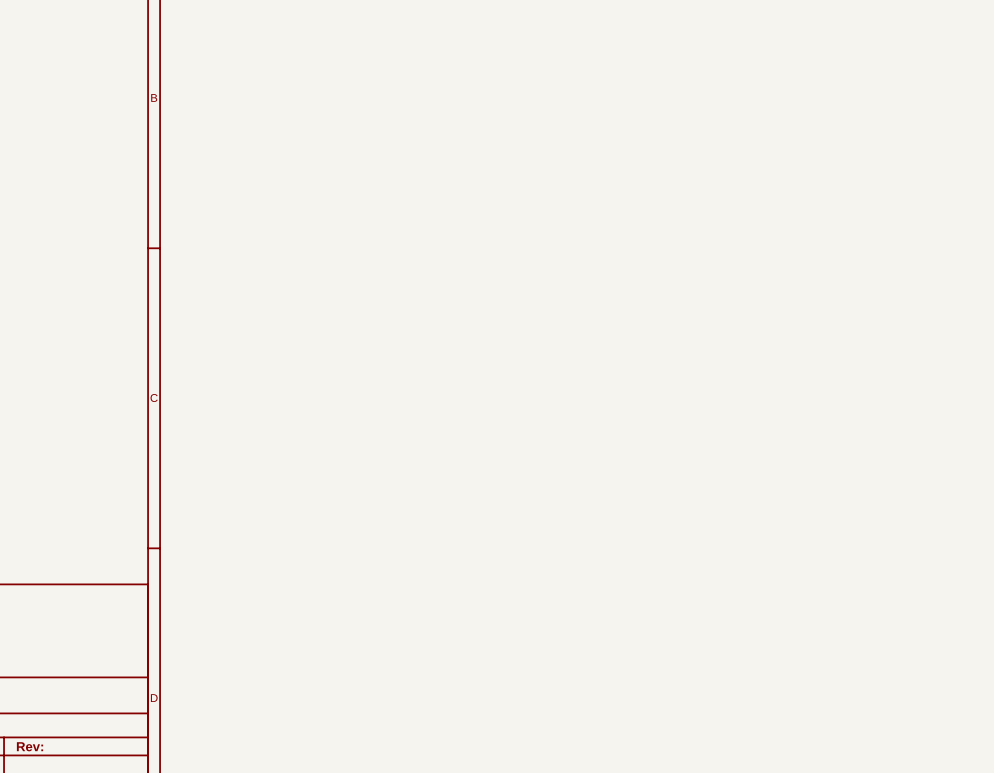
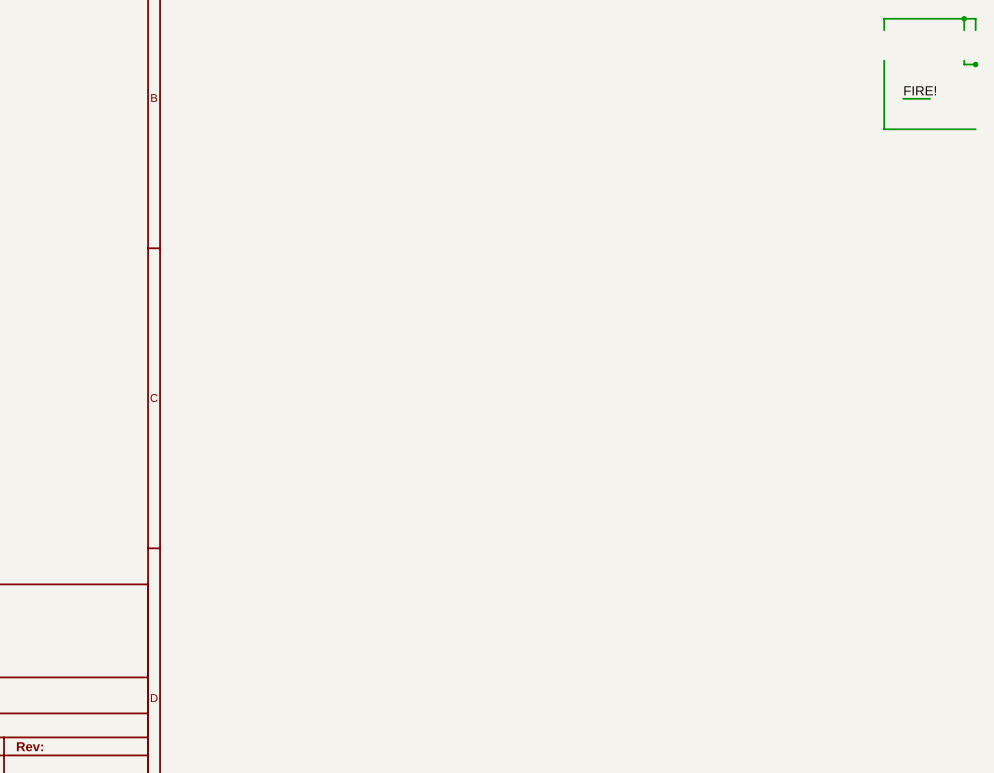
wire: none -> (964, 18) (964, 30)
junction: none -> (964, 18)
wire: none -> (884, 30) (884, 18) (975, 18) (975, 30)
wire: none -> (884, 60) (884, 129) (975, 129)
wire: none -> (964, 60) (964, 64) (975, 64)
junction: none -> (975, 64)
label: none -> FIRE! (920, 90)
wire: none -> (903, 98) (929, 98)

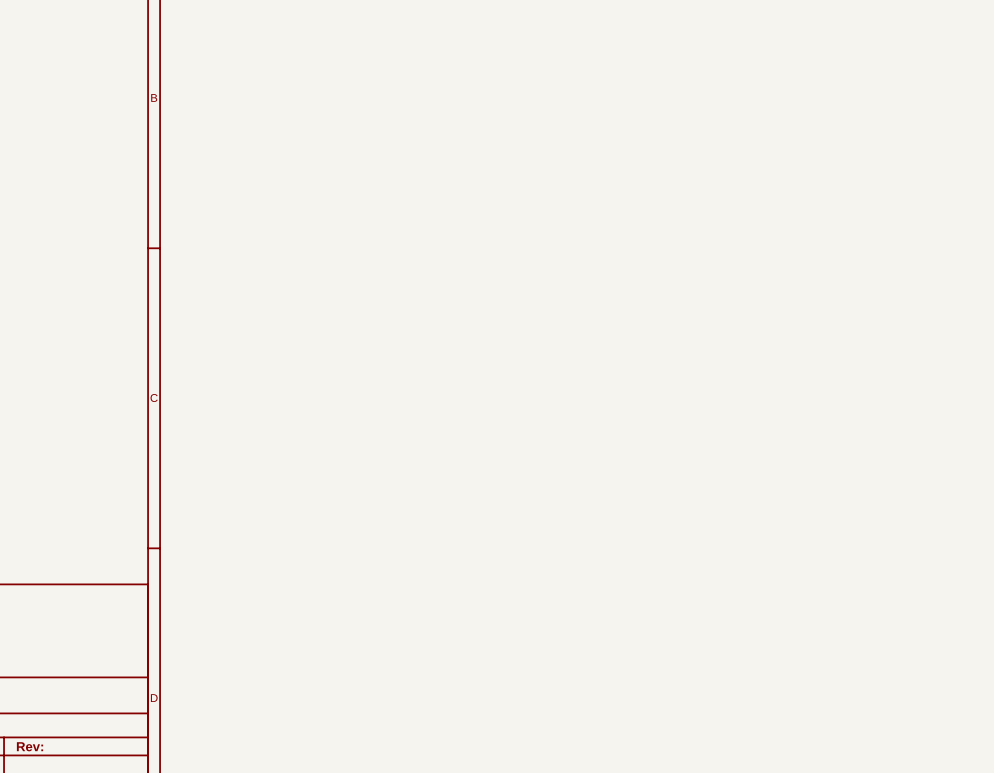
wire: (964, 18) (964, 30) -> none
junction: (964, 18) -> none
wire: (884, 30) (884, 18) (975, 18) (975, 30) -> none
wire: (884, 60) (884, 129) (975, 129) -> none
wire: (964, 60) (964, 64) (975, 64) -> none
junction: (975, 64) -> none
label: FIRE! (920, 90) -> none
wire: (903, 98) (929, 98) -> none

